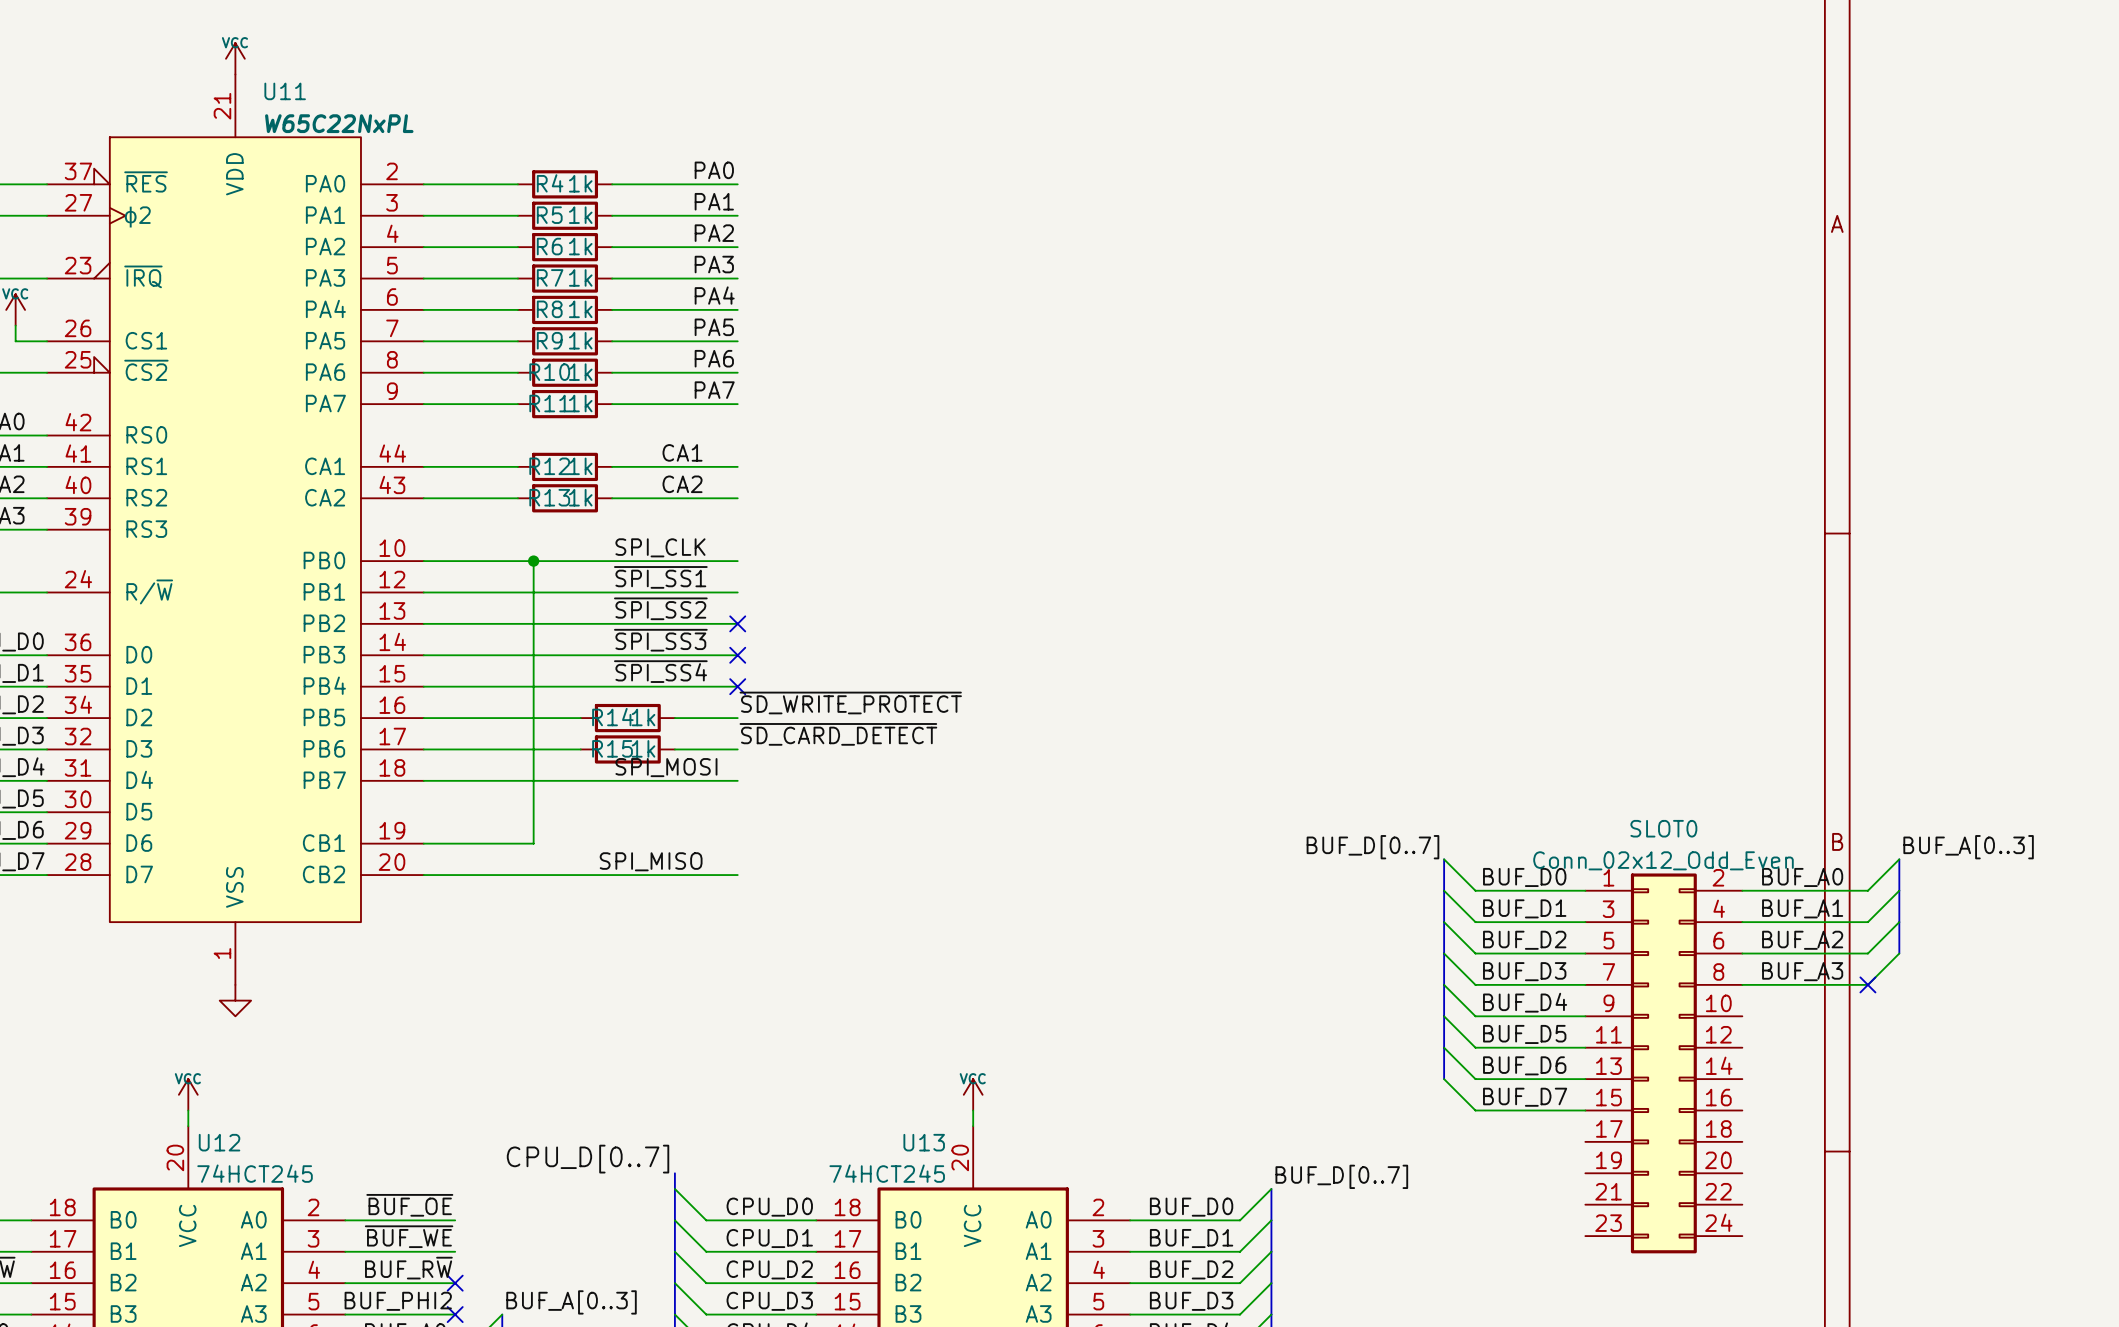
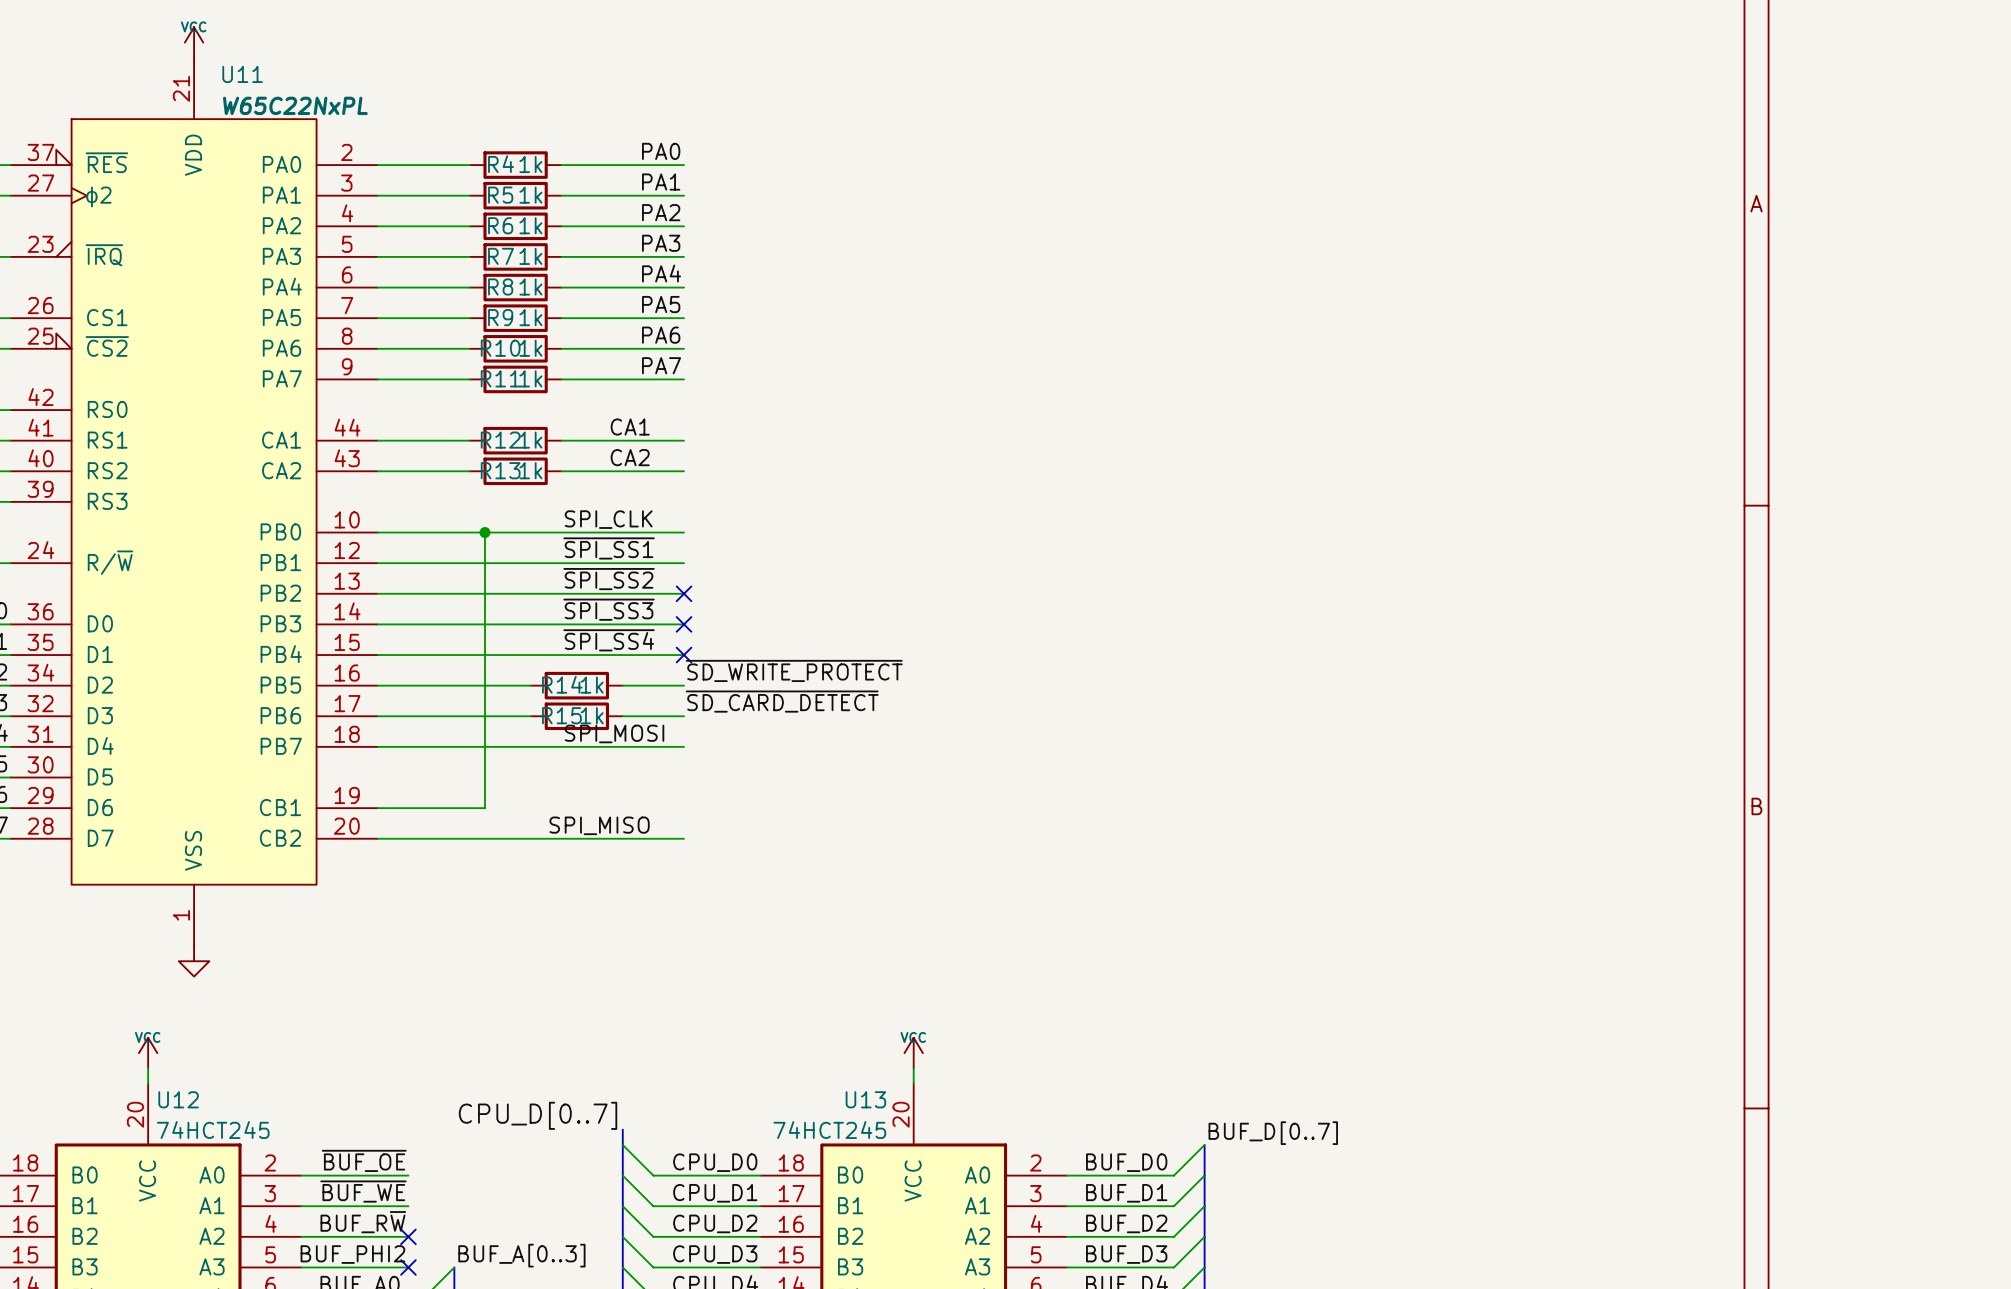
label: BUF_D[0..7] (1372, 847) -> none
label: BUF_A[0..3] (1968, 847) -> none
wire: (1444, 859) (1475, 890) (1585, 890) -> none
bus: (1444, 859) (1444, 1079) -> none
wire: (1899, 859) (1867, 890) (1742, 890) -> none
bus: (1899, 859) (1899, 953) -> none
label: BUF_D0 (1524, 877) -> none
label: BUF_A0 (1802, 877) -> none
wire: (1444, 890) (1475, 922) (1585, 922) -> none
wire: (1899, 890) (1867, 922) (1742, 922) -> none
label: BUF_D1 (1524, 908) -> none
label: BUF_A1 (1802, 908) -> none
wire: (1444, 922) (1475, 953) (1585, 953) -> none
wire: (1899, 922) (1867, 953) (1742, 953) -> none
label: BUF_D2 (1524, 940) -> none
label: BUF_A2 (1802, 940) -> none
wire: (1444, 953) (1475, 984) (1585, 984) -> none
wire: (1899, 953) (1867, 984) (1742, 984) -> none
label: BUF_D3 (1524, 971) -> none
label: BUF_A3 (1802, 971) -> none
wire: (1444, 984) (1475, 1016) (1585, 1016) -> none
no-connect mark: (1867, 984) -> none
label: BUF_D4 (1525, 1002) -> none
wire: (1444, 1016) (1475, 1047) (1585, 1047) -> none
label: BUF_D5 (1524, 1034) -> none
wire: (1444, 1047) (1475, 1079) (1585, 1079) -> none
SLOT0: Conn_02x12_Odd_Even (1663, 1063) -> none
label: BUF_D6 (1524, 1065) -> none
wire: (1444, 1079) (1475, 1110) (1585, 1110) -> none
label: BUF_D7 (1525, 1097) -> none

